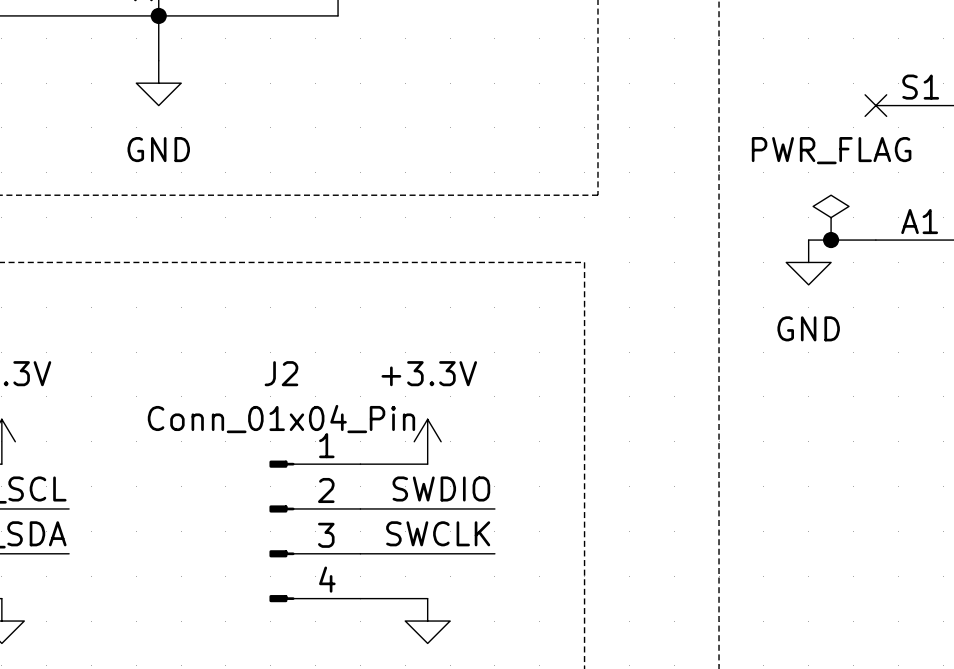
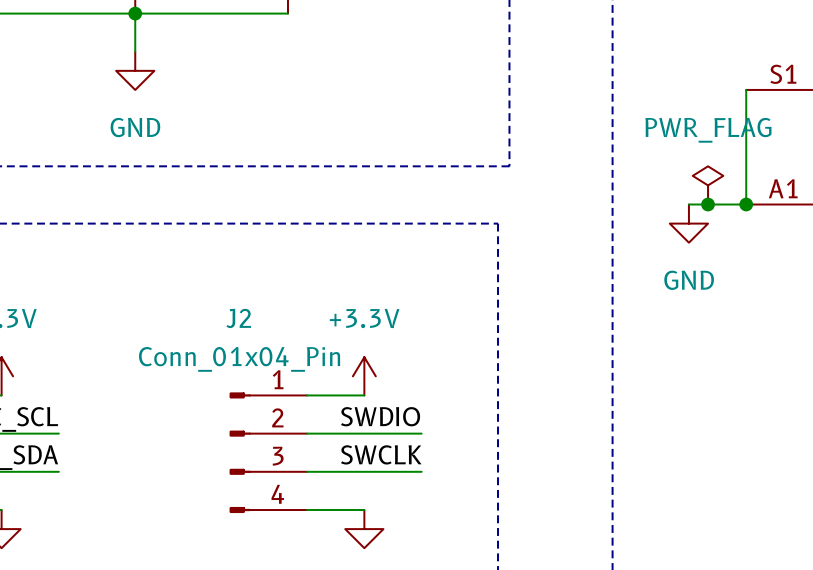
wire: none -> (746, 89) (746, 204)
no-connect mark: (875, 105) -> none
junction: none -> (746, 204)

